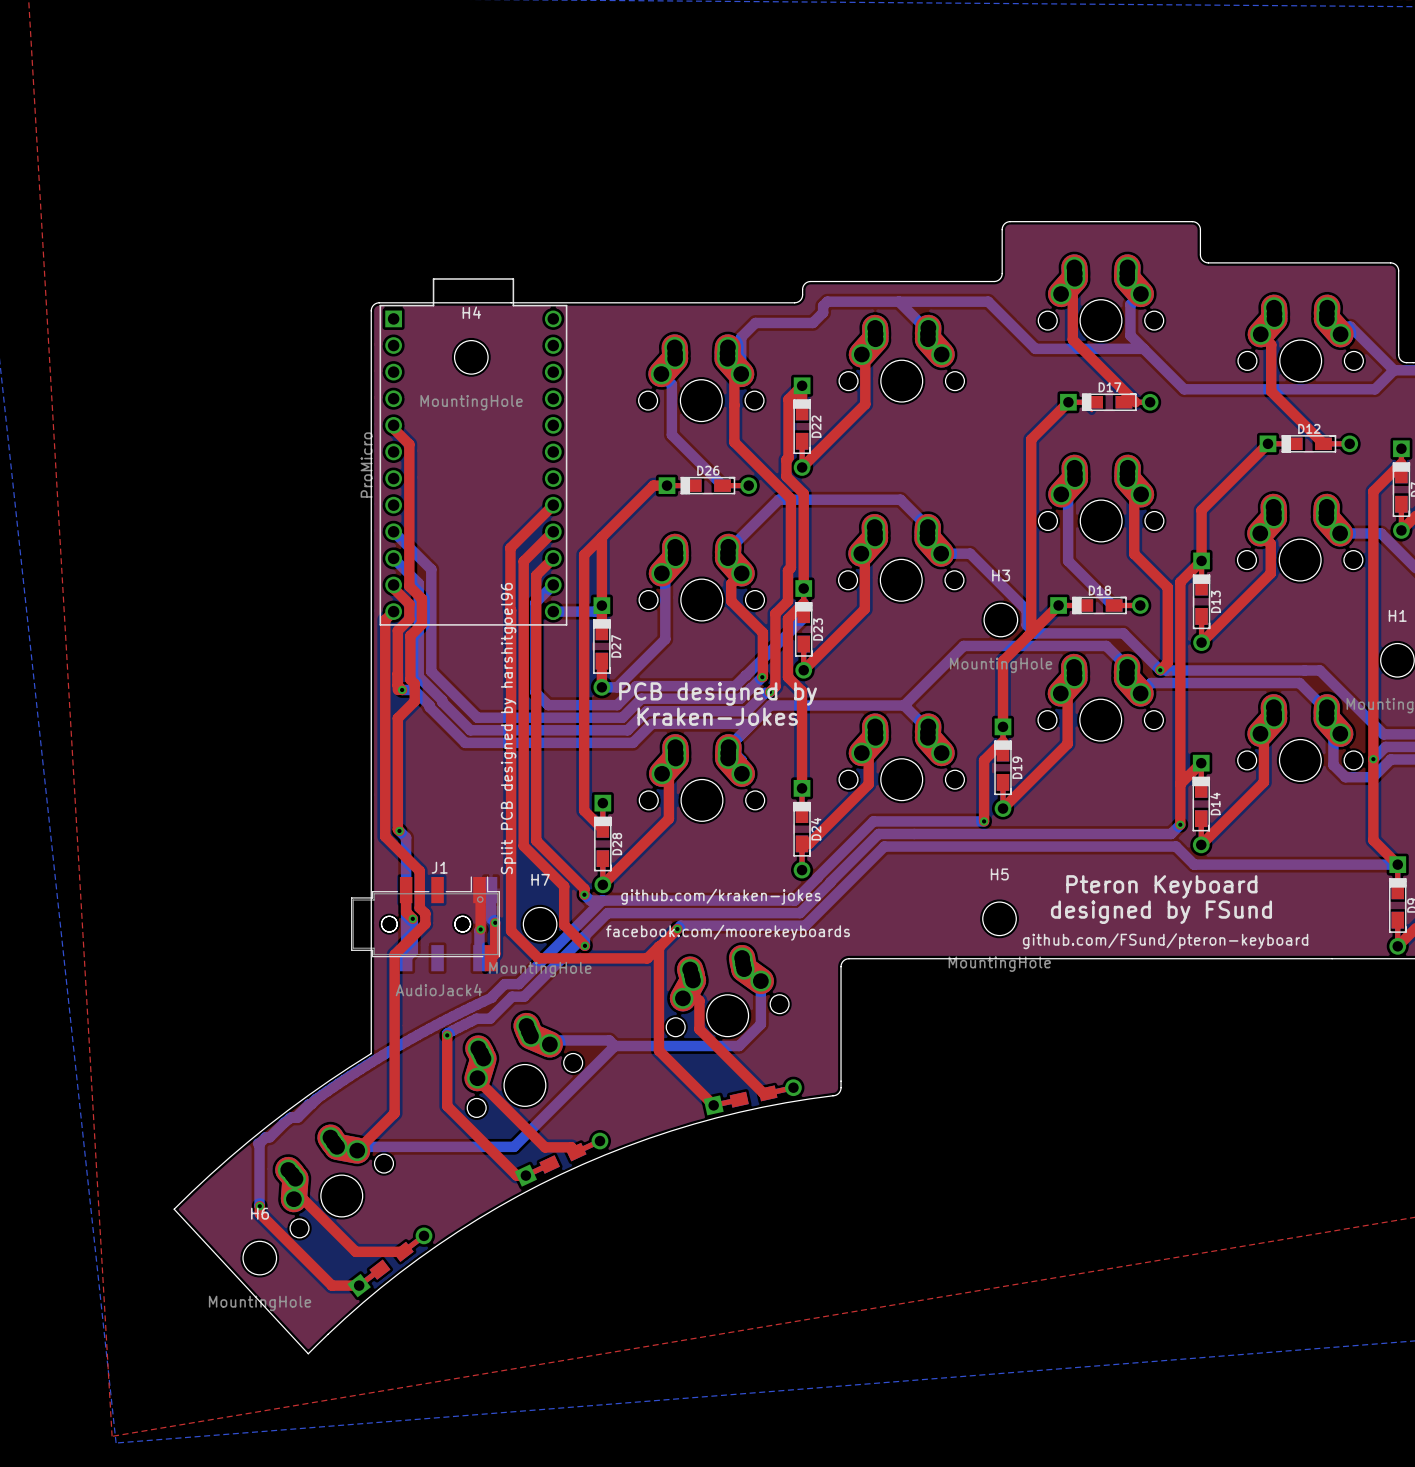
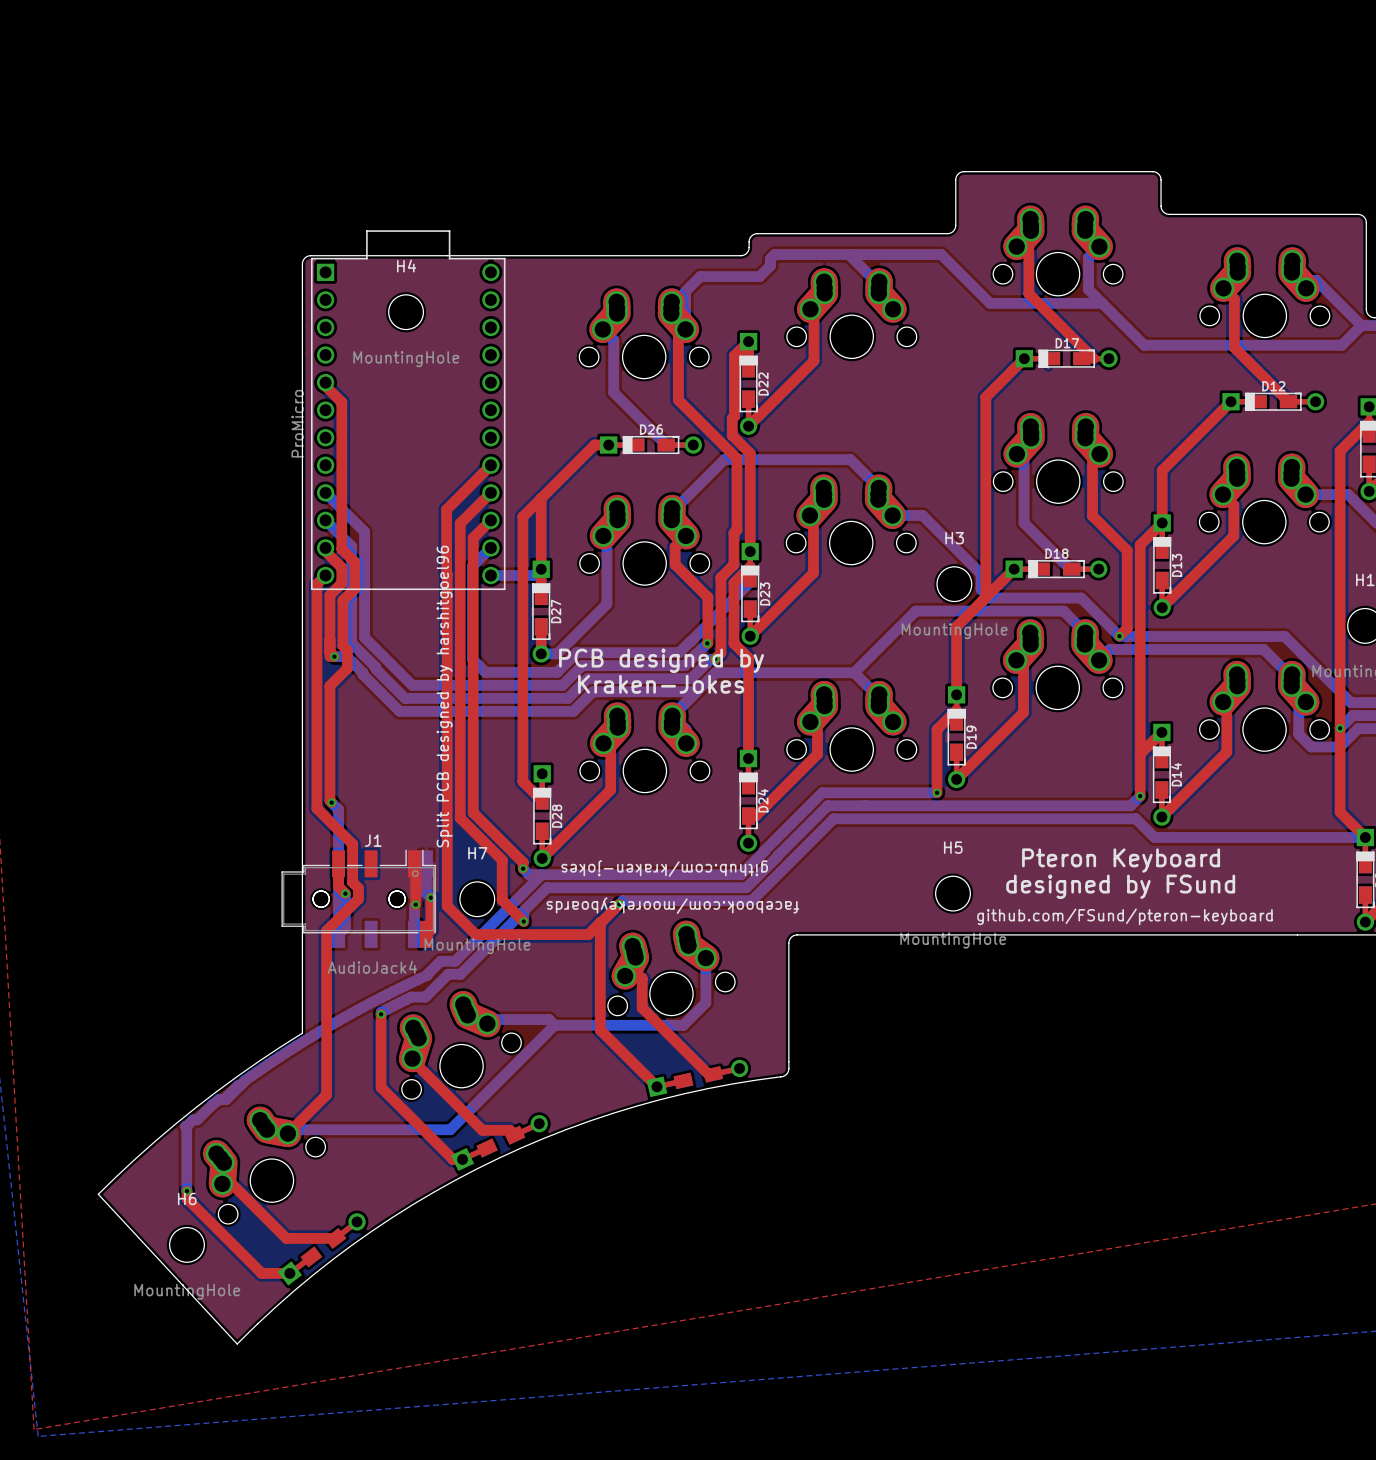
text rotation: 0° (721, 896) -> 180° (664, 868)
text rotation: 0° (728, 932) -> 180° (672, 905)

